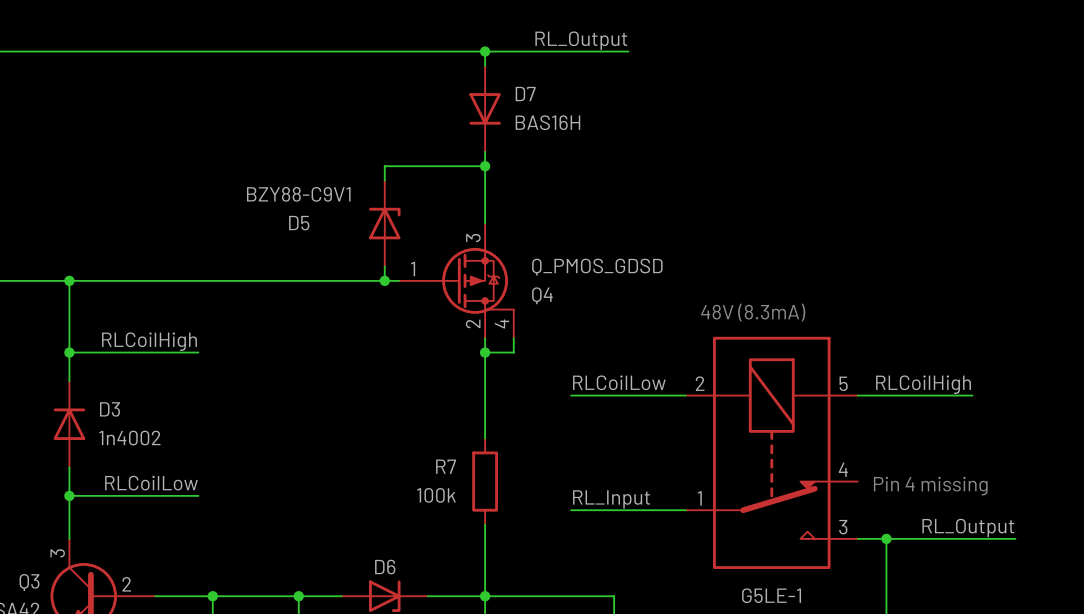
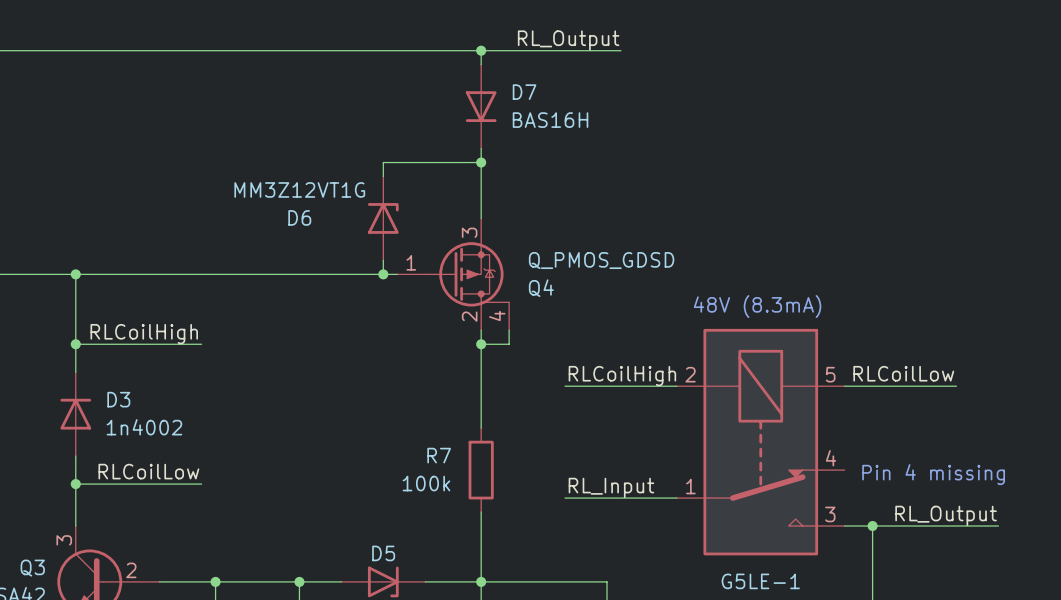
D5 value: BZY88-C9V1 (298, 194) -> MM3Z12VT1G (299, 189)
D5 name: D5 (299, 223) -> D6 (299, 217)
label: RLCoilLow (619, 382) -> RLCoilHigh (622, 376)
label: RLCoilHigh (923, 384) -> RLCoilLow (903, 373)
D6 name: D6 (385, 567) -> D5 (383, 553)

